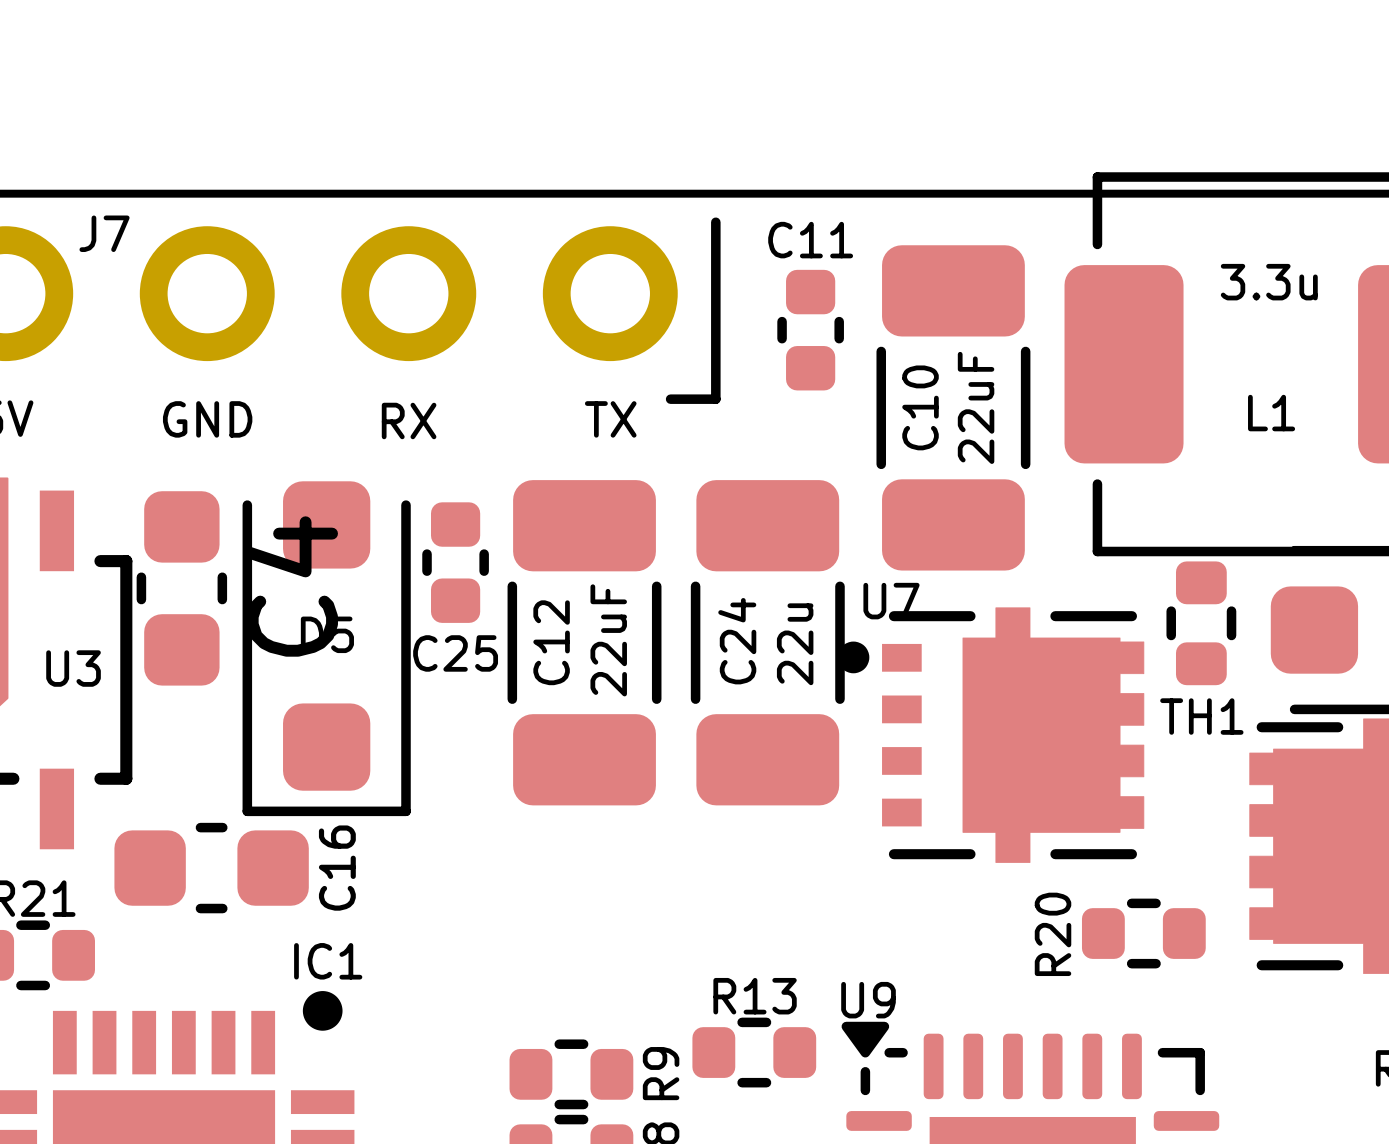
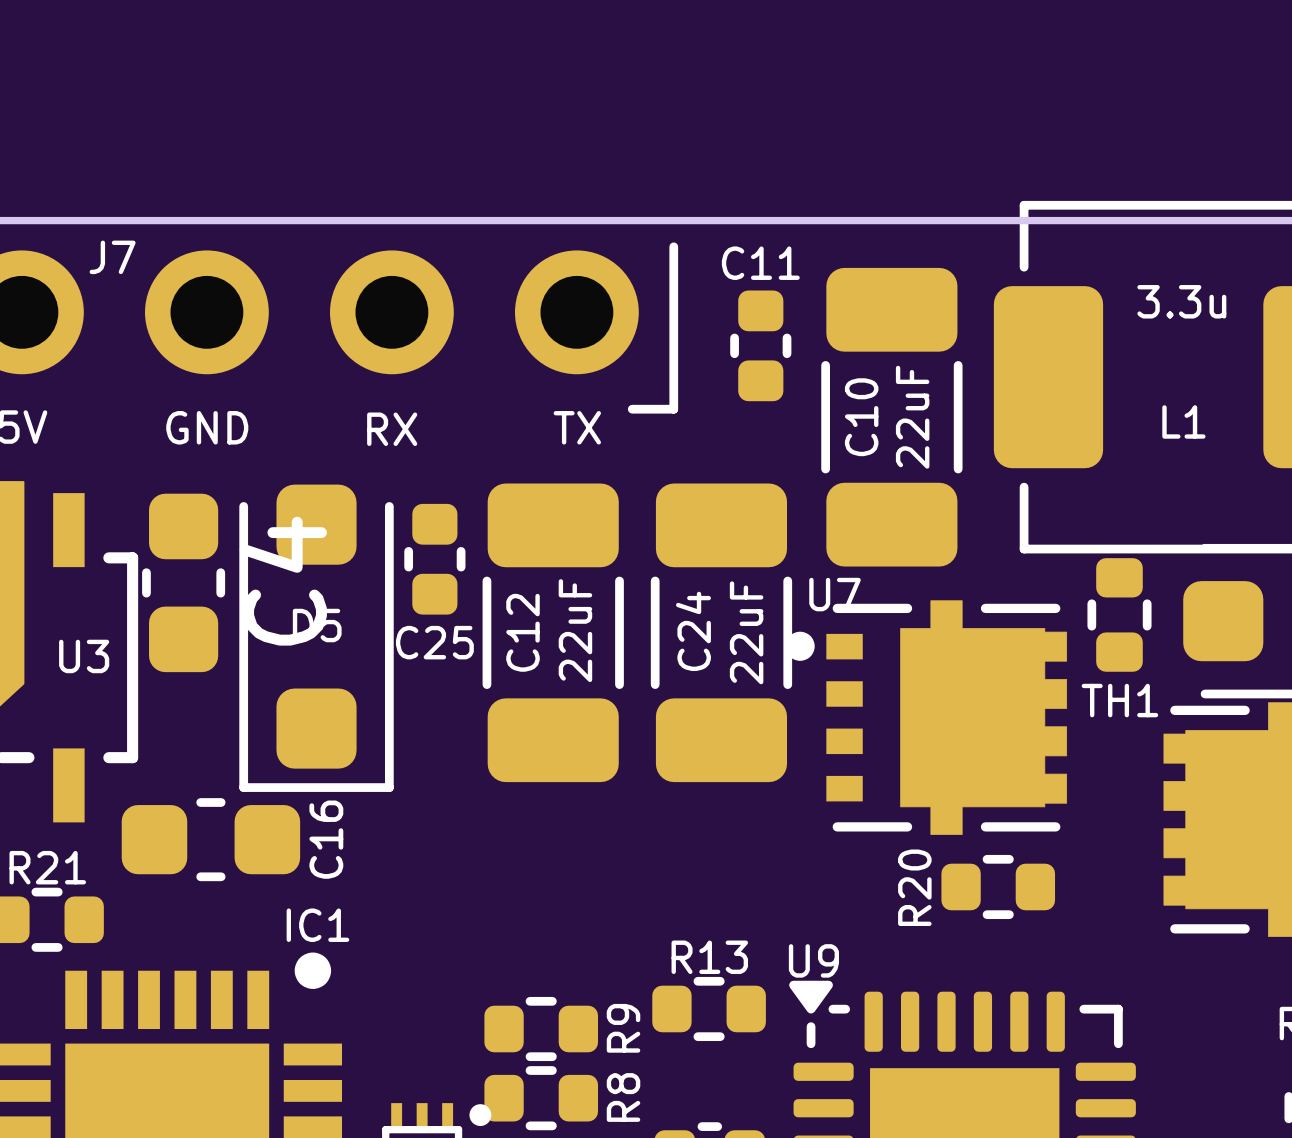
C24 value: 22u (795, 644) -> 22uF (746, 632)
R20 position: (1143, 933) -> (998, 886)

